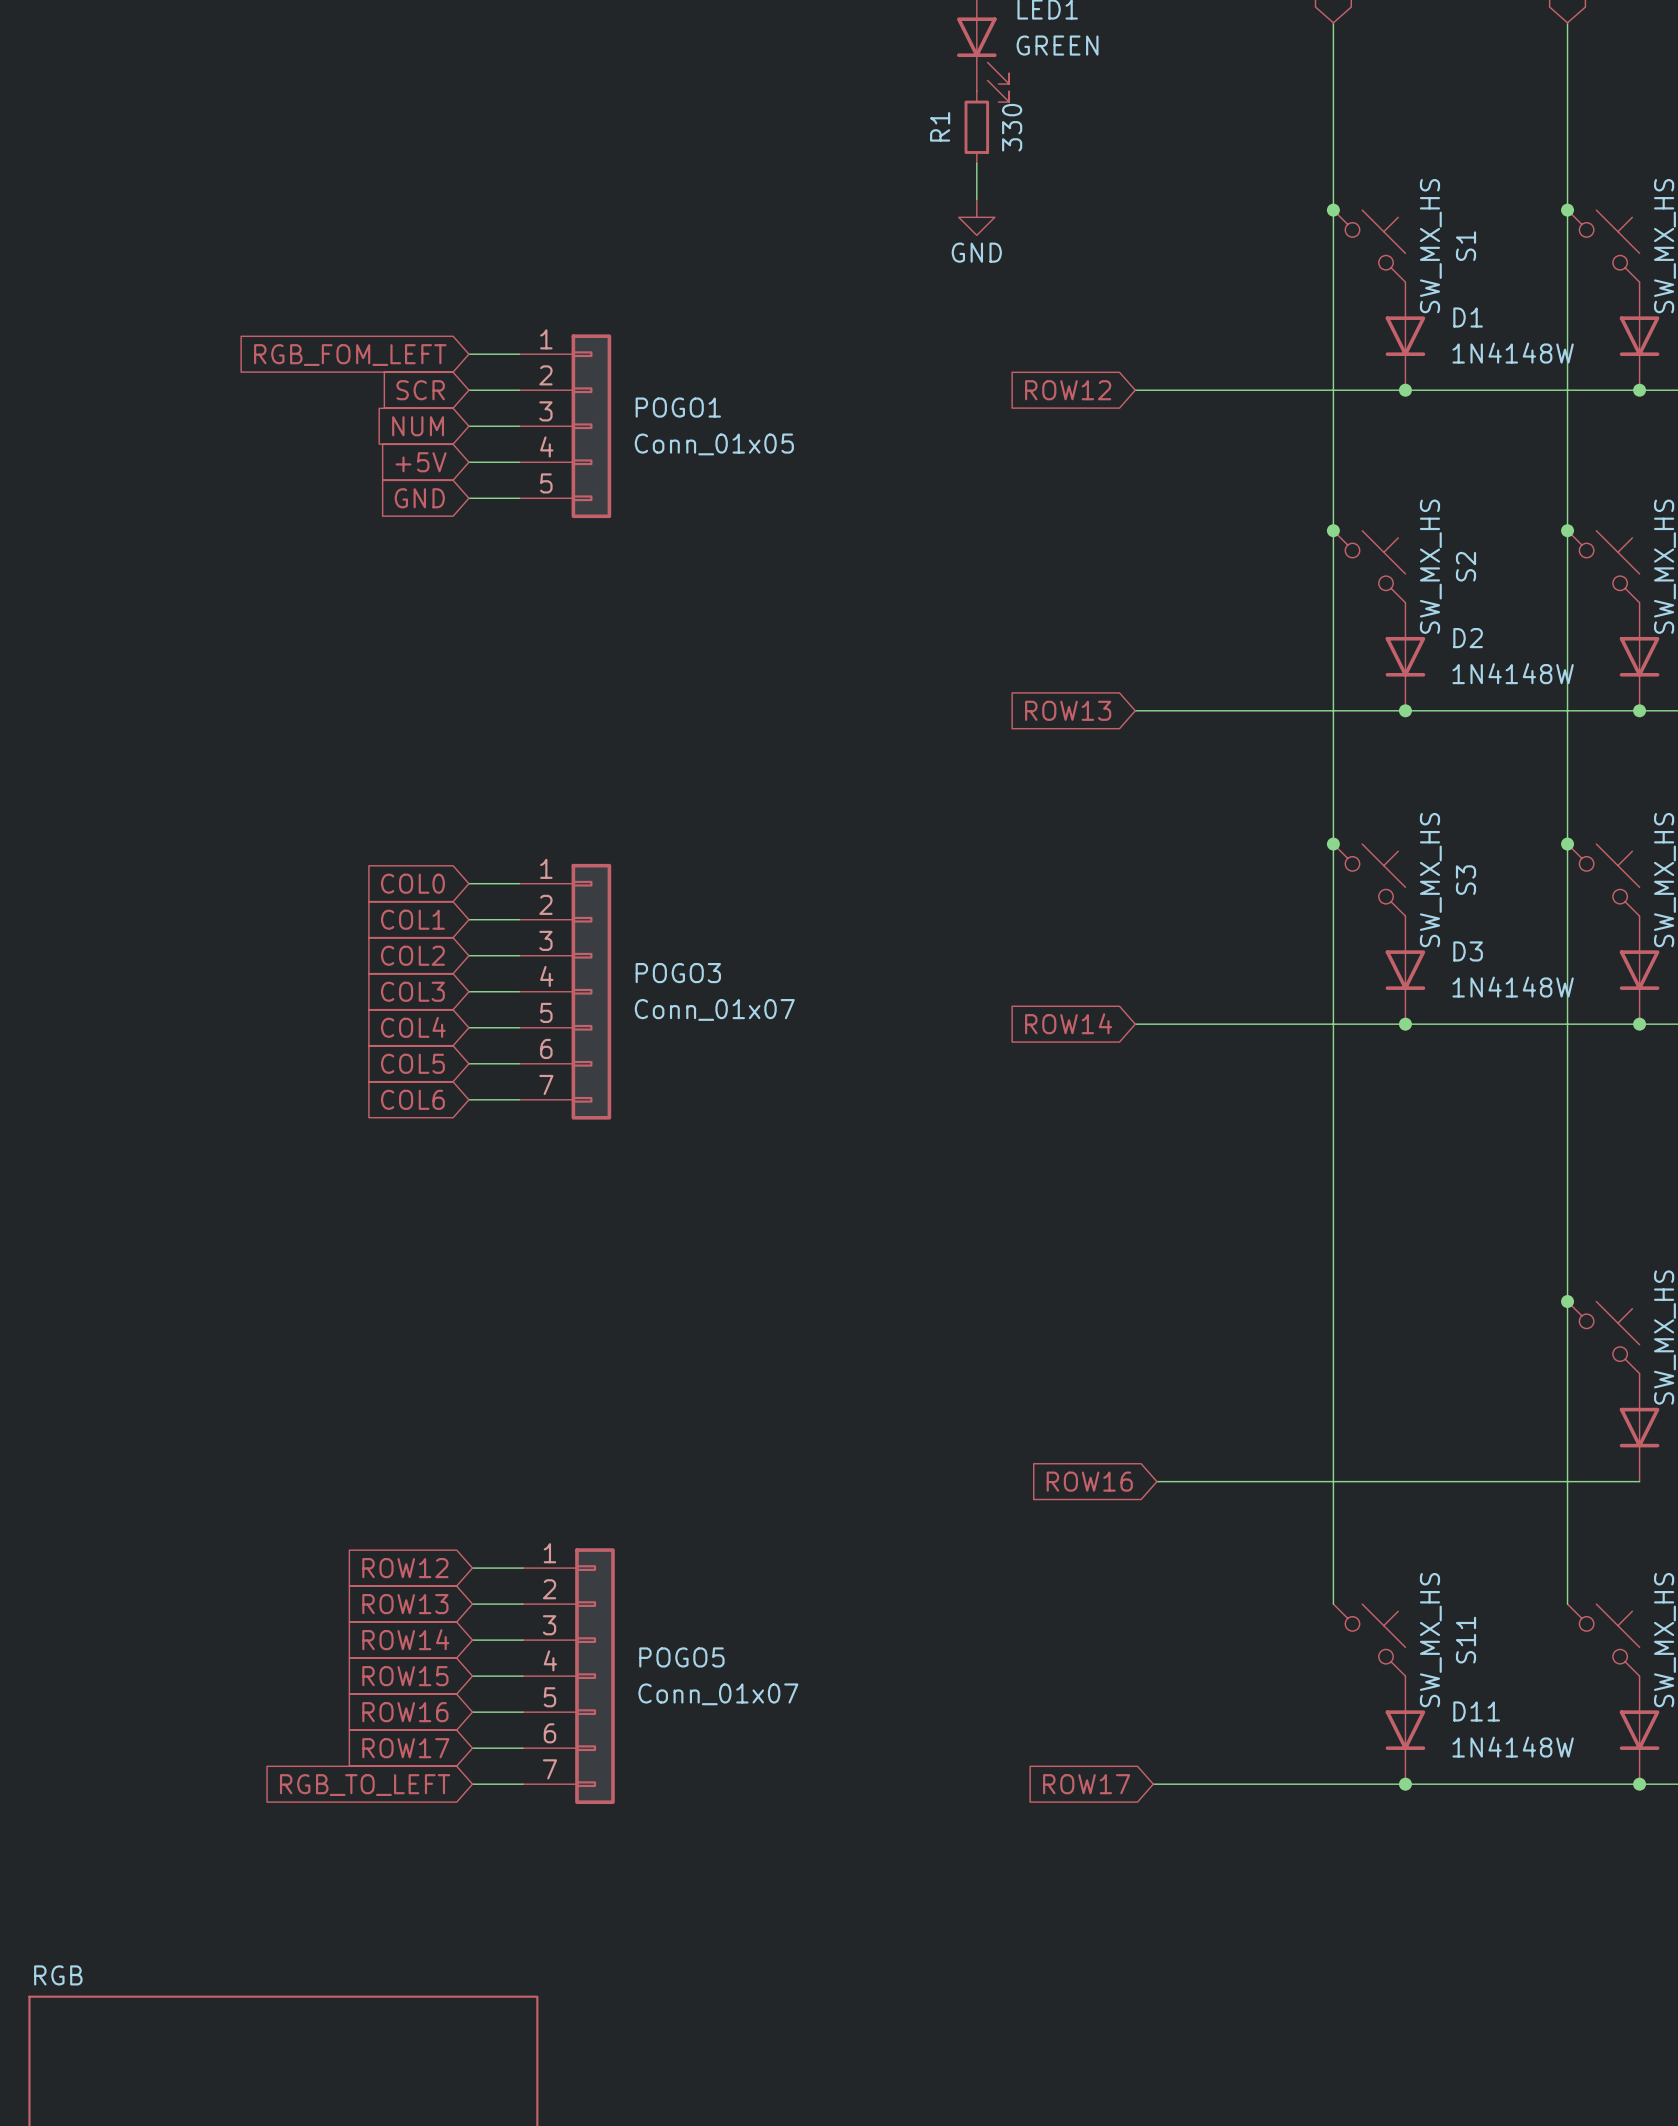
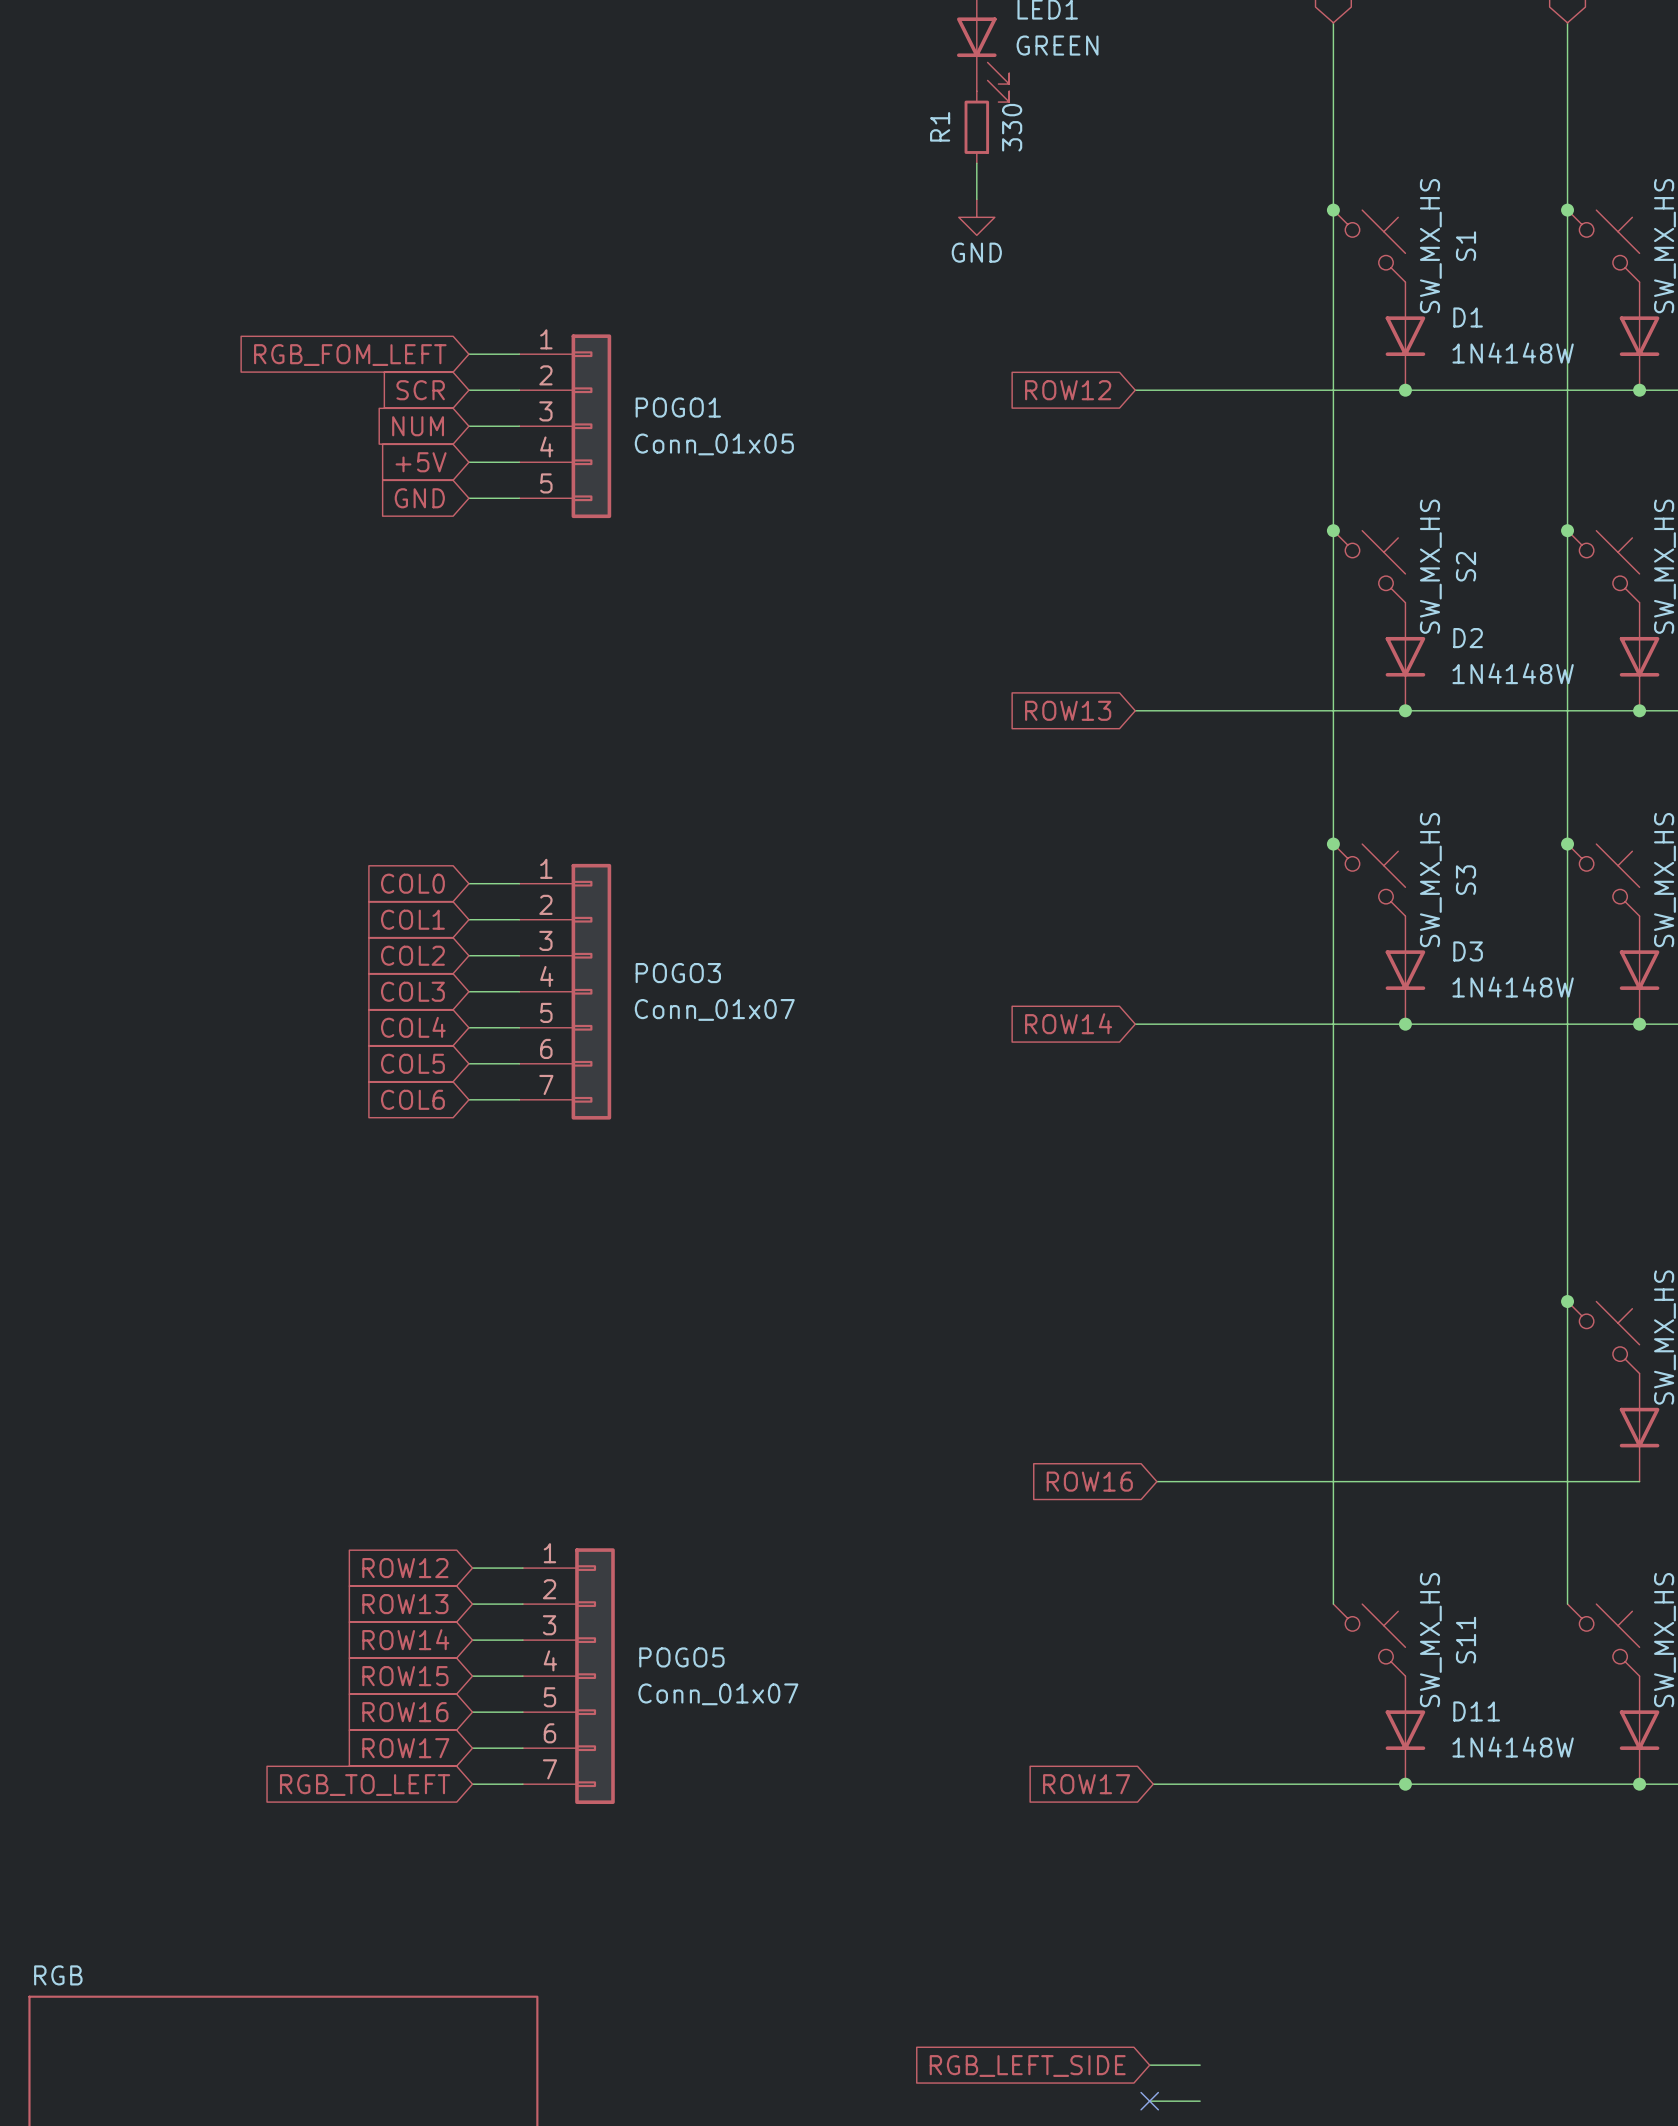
wire: none -> (1149, 2065) (1200, 2065)
global label: none -> RGB_LEFT_SIDE (1027, 2066)
wire: none -> (1149, 2101) (1200, 2101)
no-connect mark: none -> (1149, 2101)

